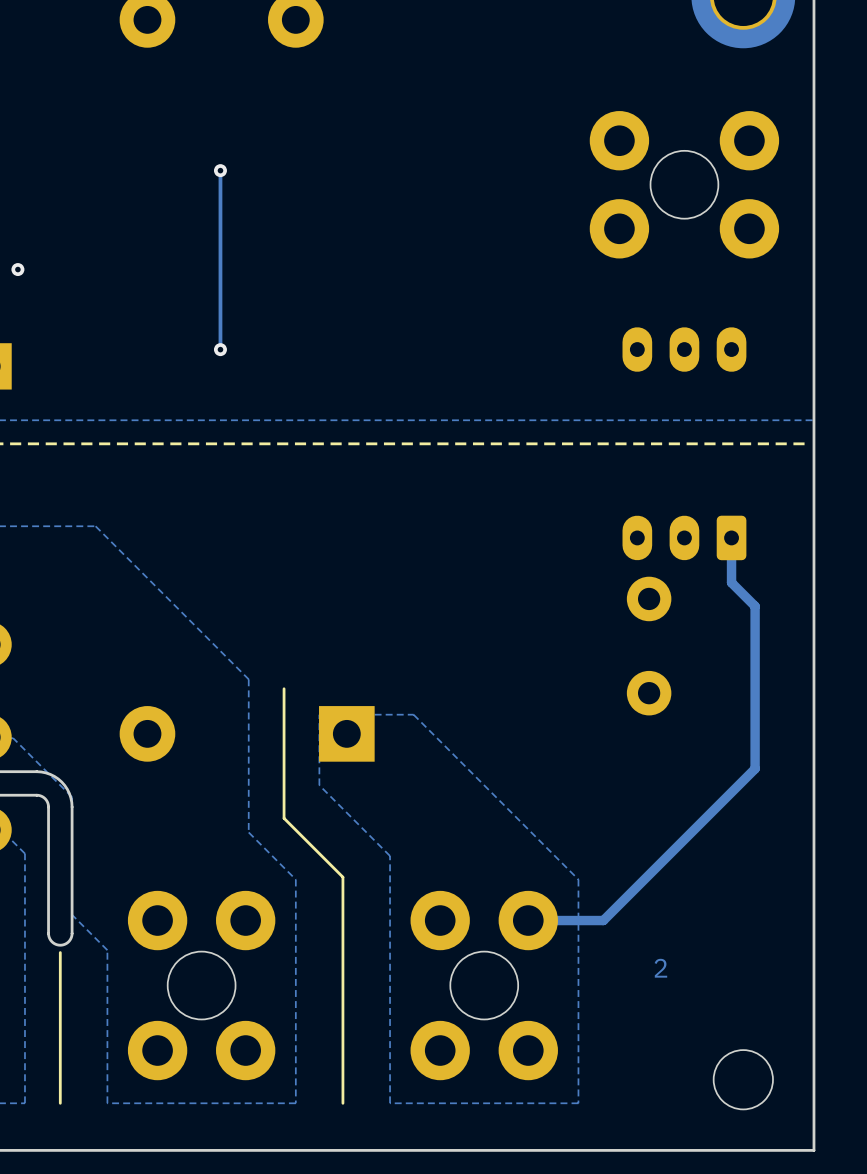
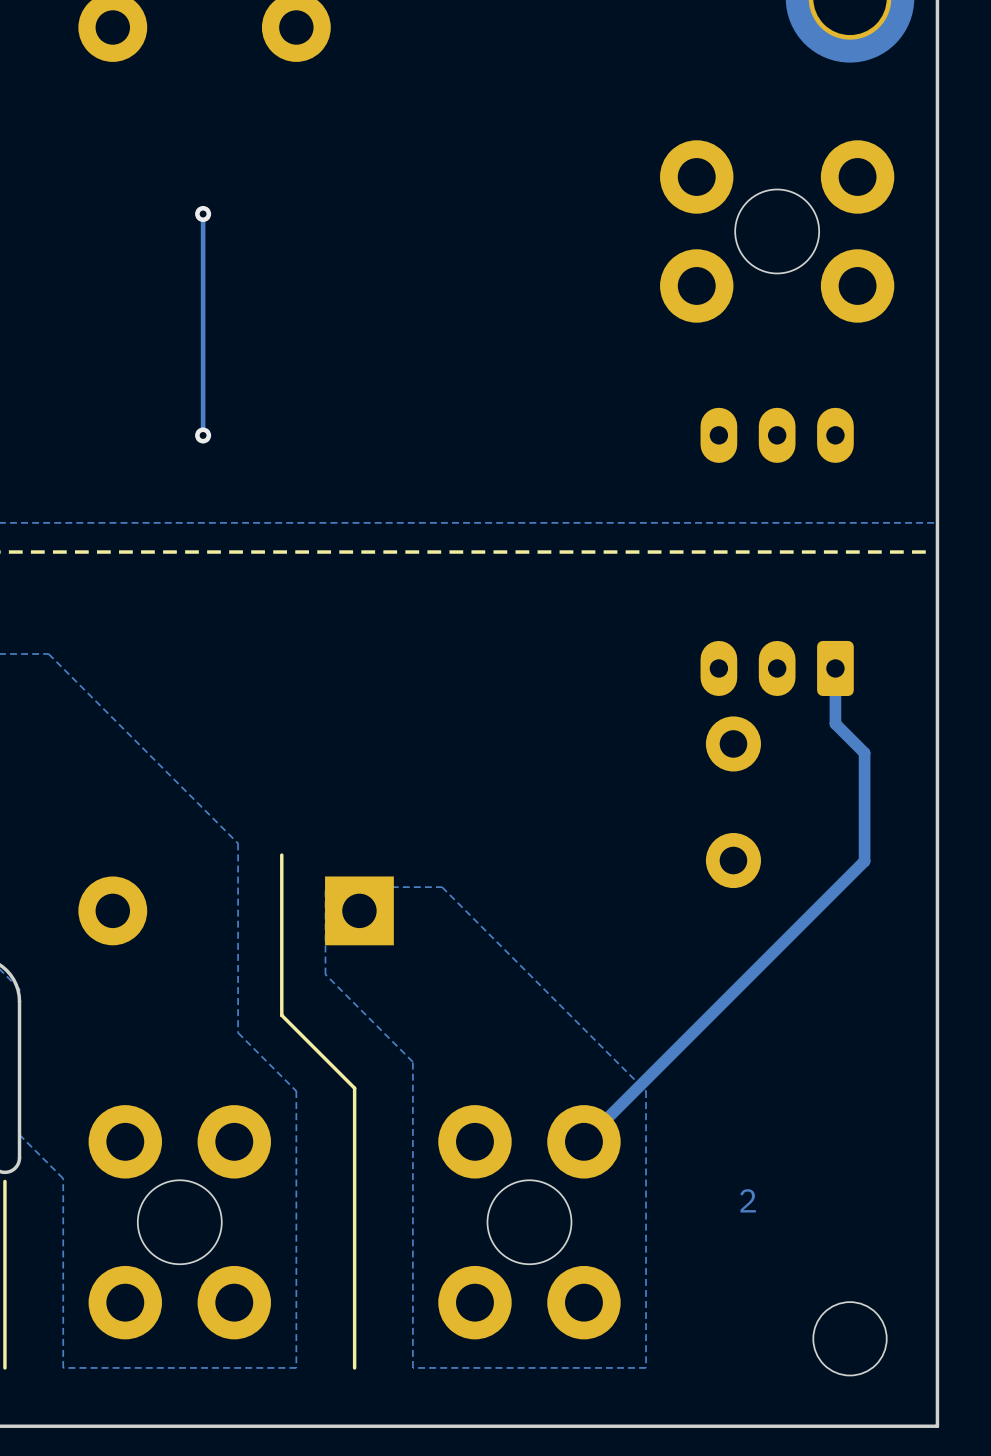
track: (755, 693) (755, 768) (603, 920) (528, 920) -> (864, 861) (583, 1141)

